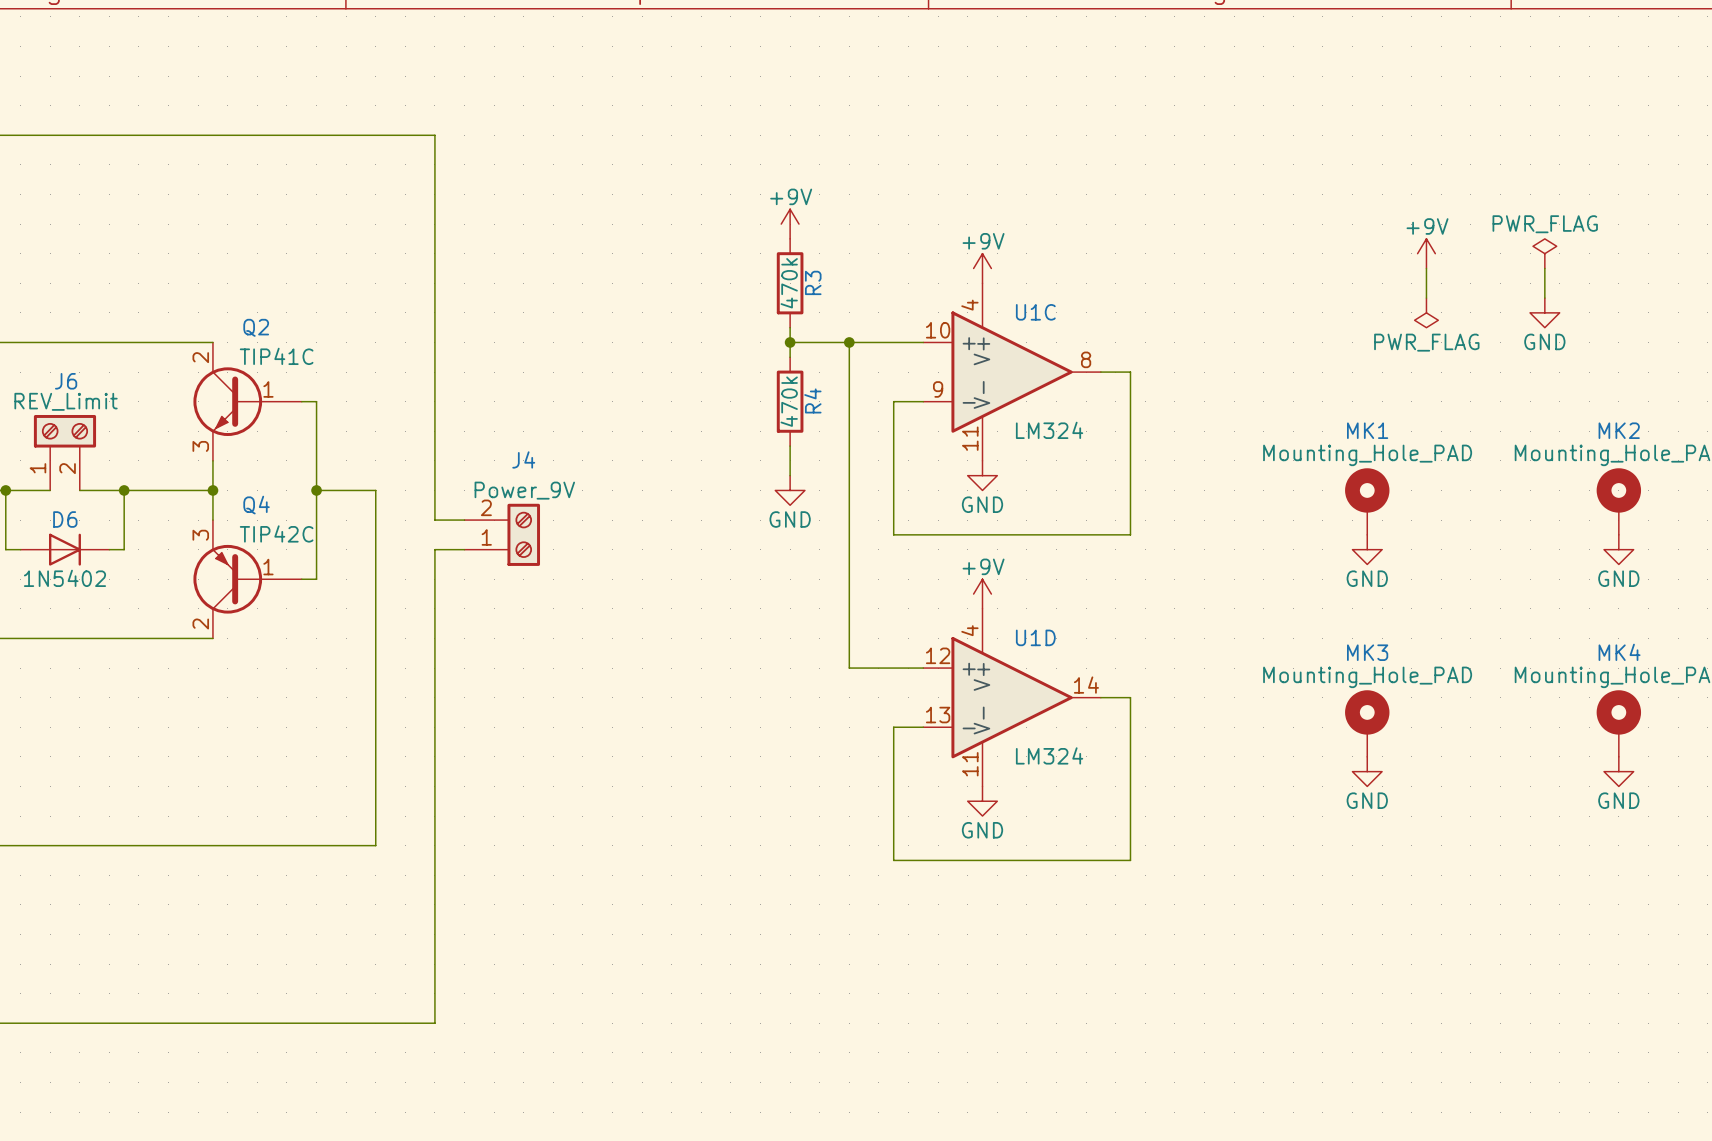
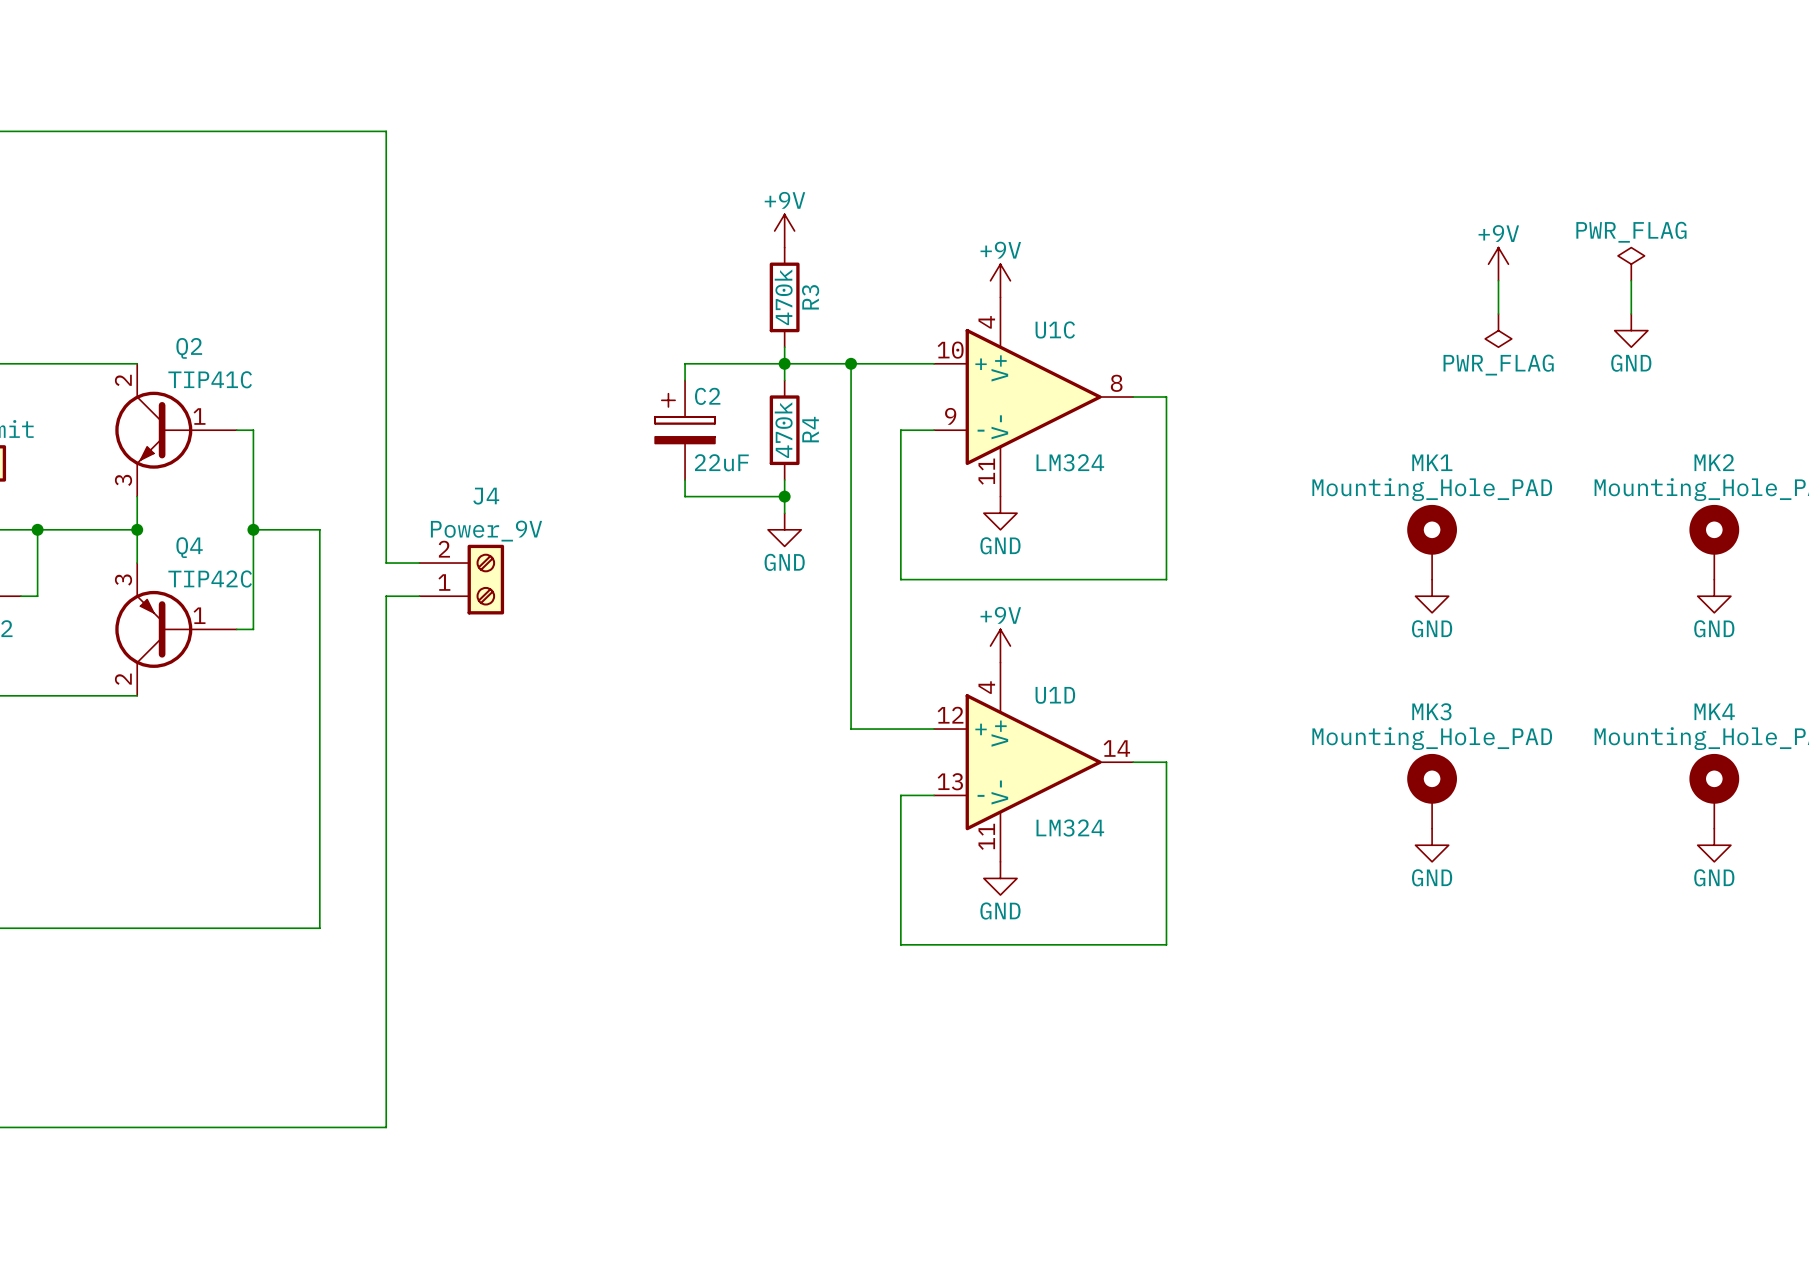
wire: none -> (784, 363) (685, 363) (685, 380)
C2: none -> 22uF (685, 430)
wire: none -> (685, 480) (685, 496) (784, 496)
junction: none -> (784, 496)

